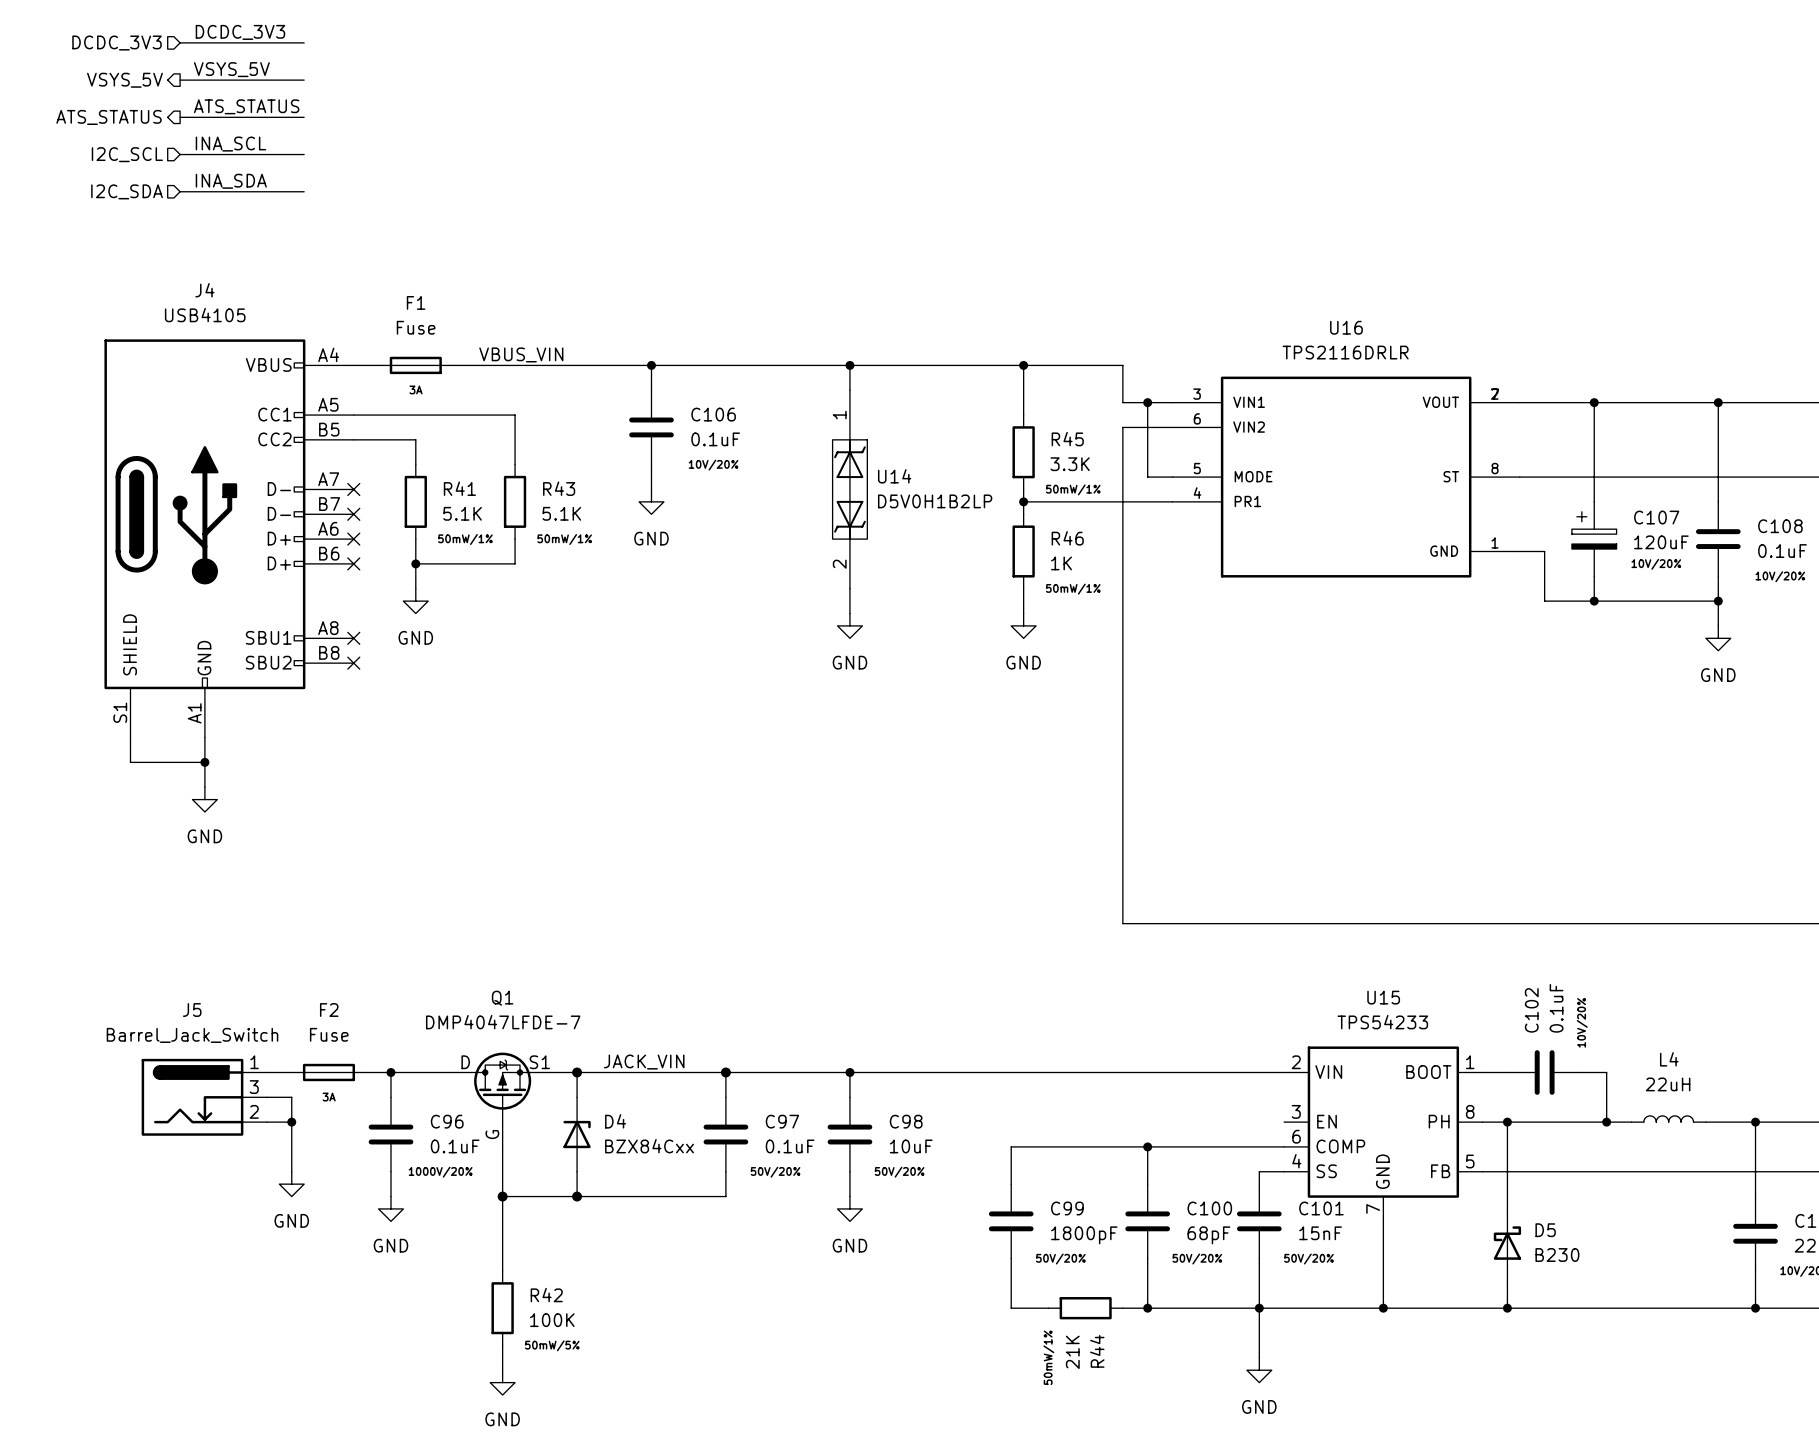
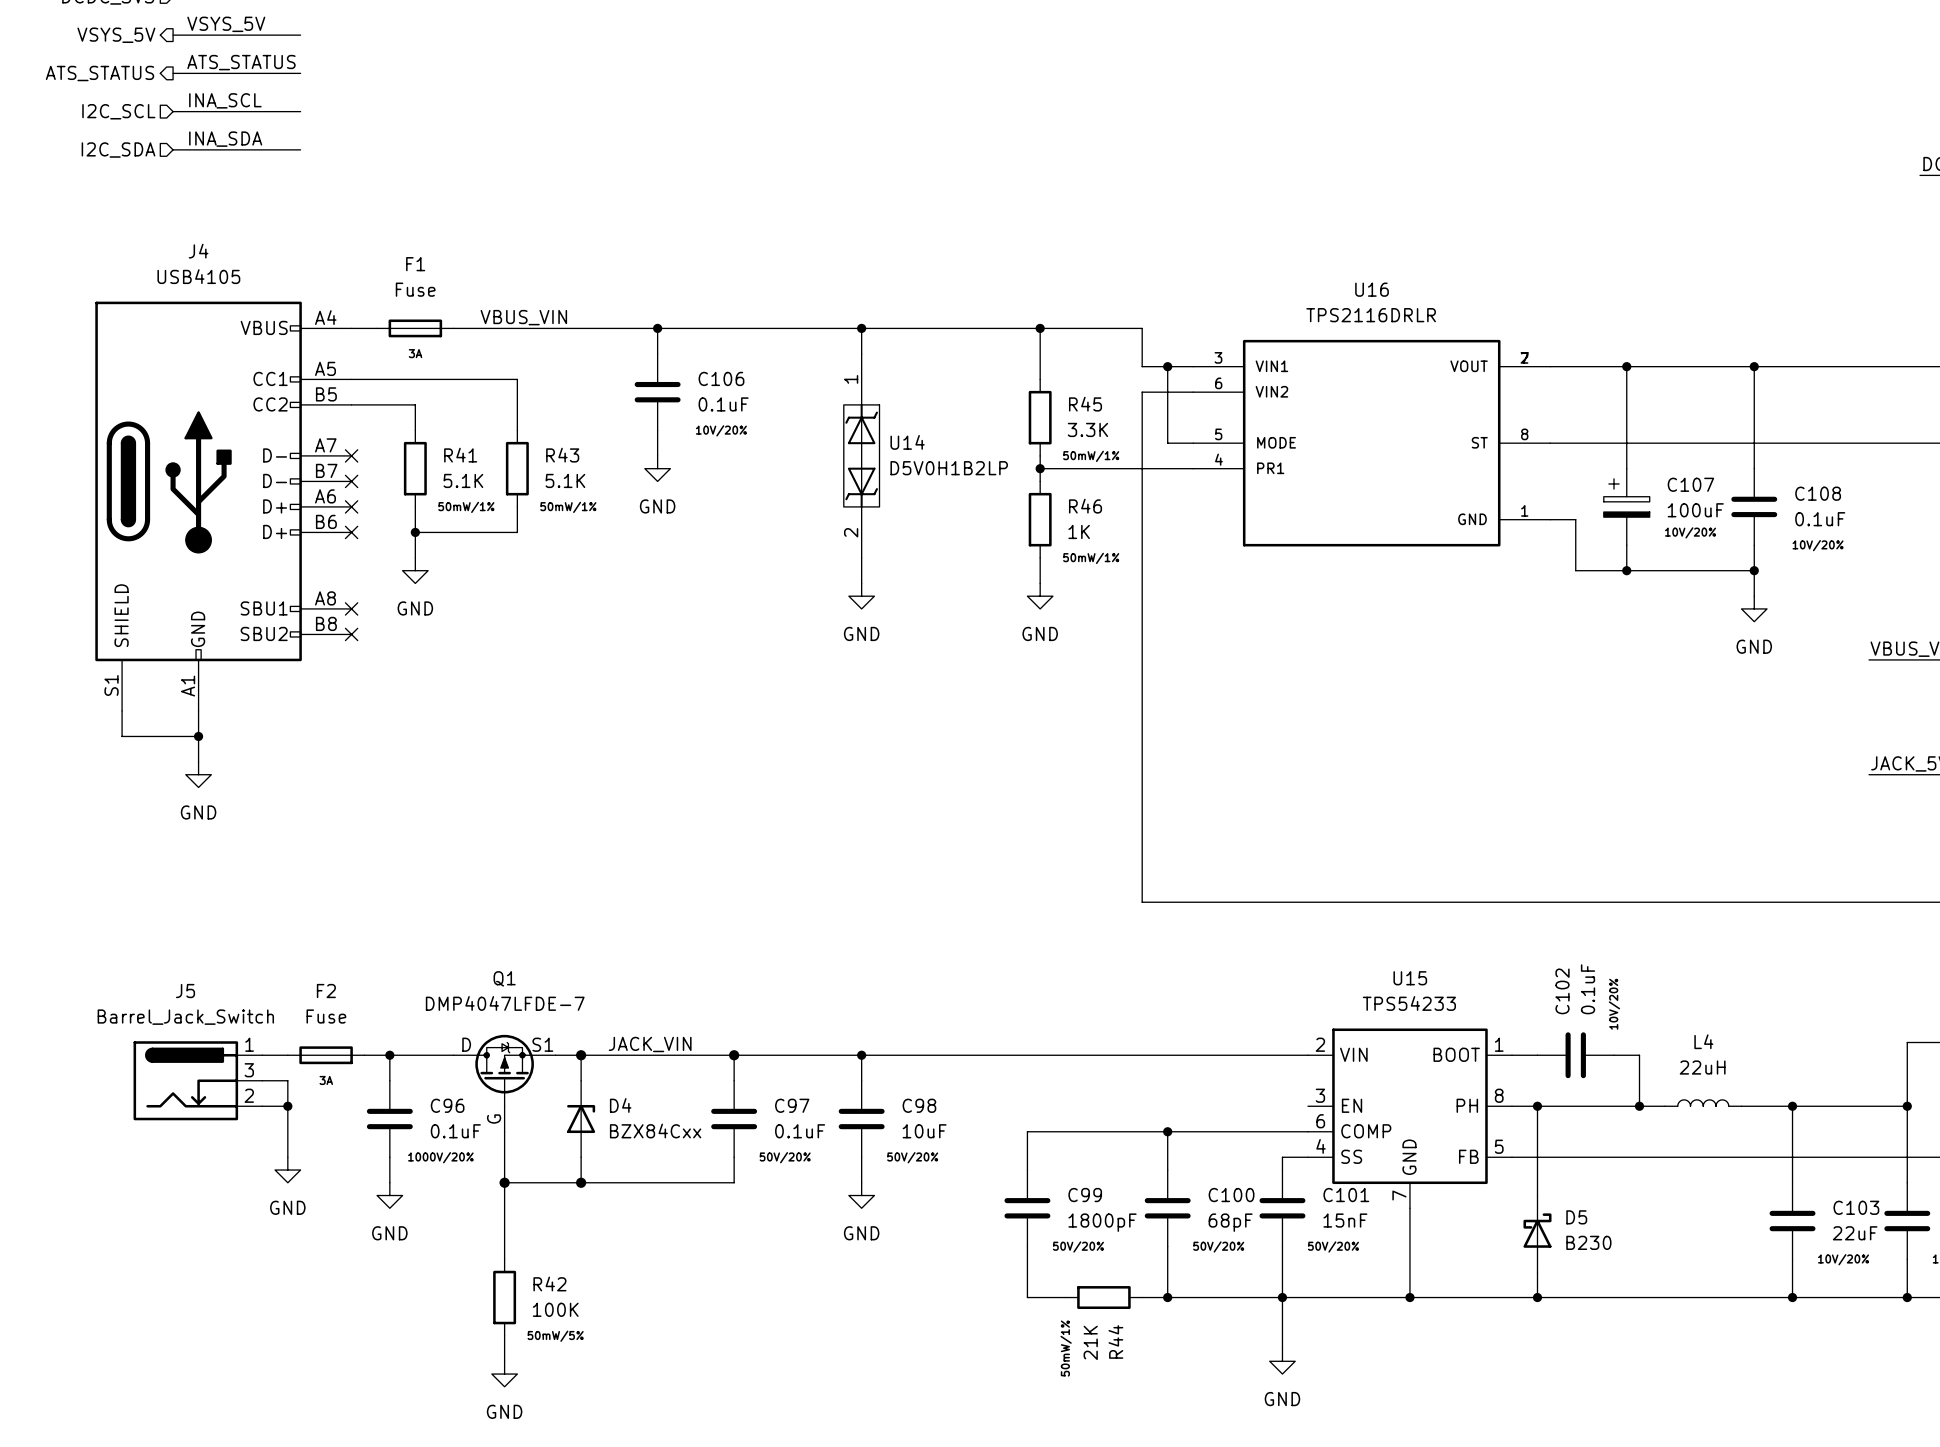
C107 value: 120uF (1661, 542) -> 100uF (1695, 510)

